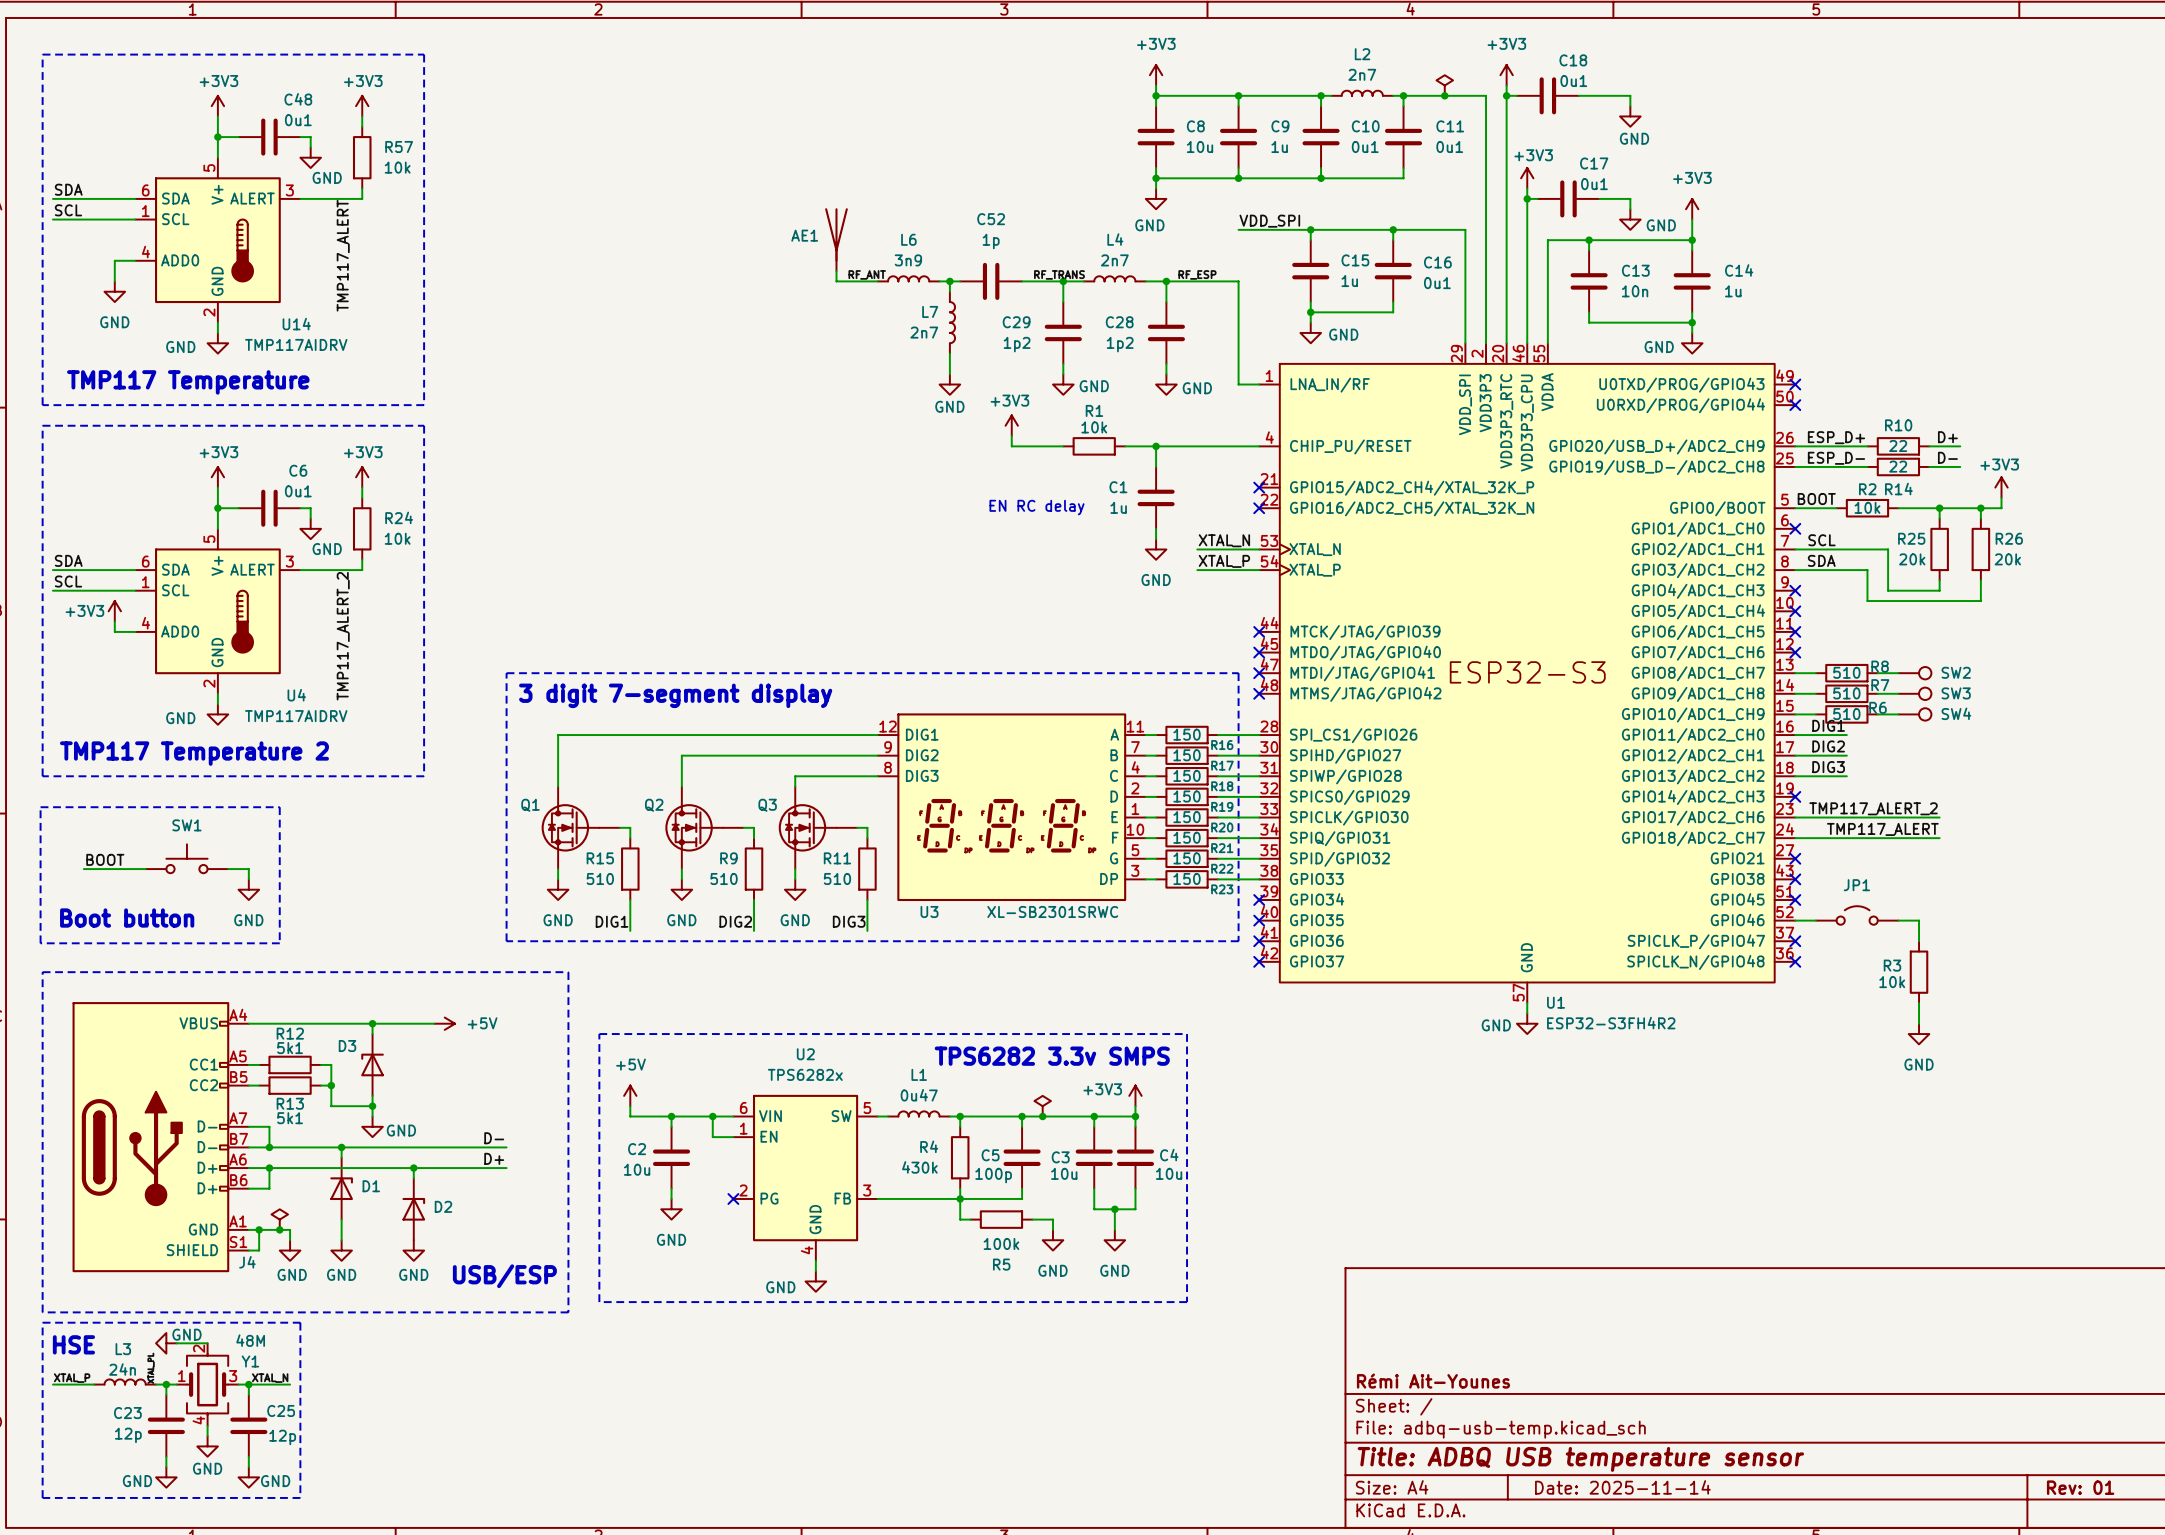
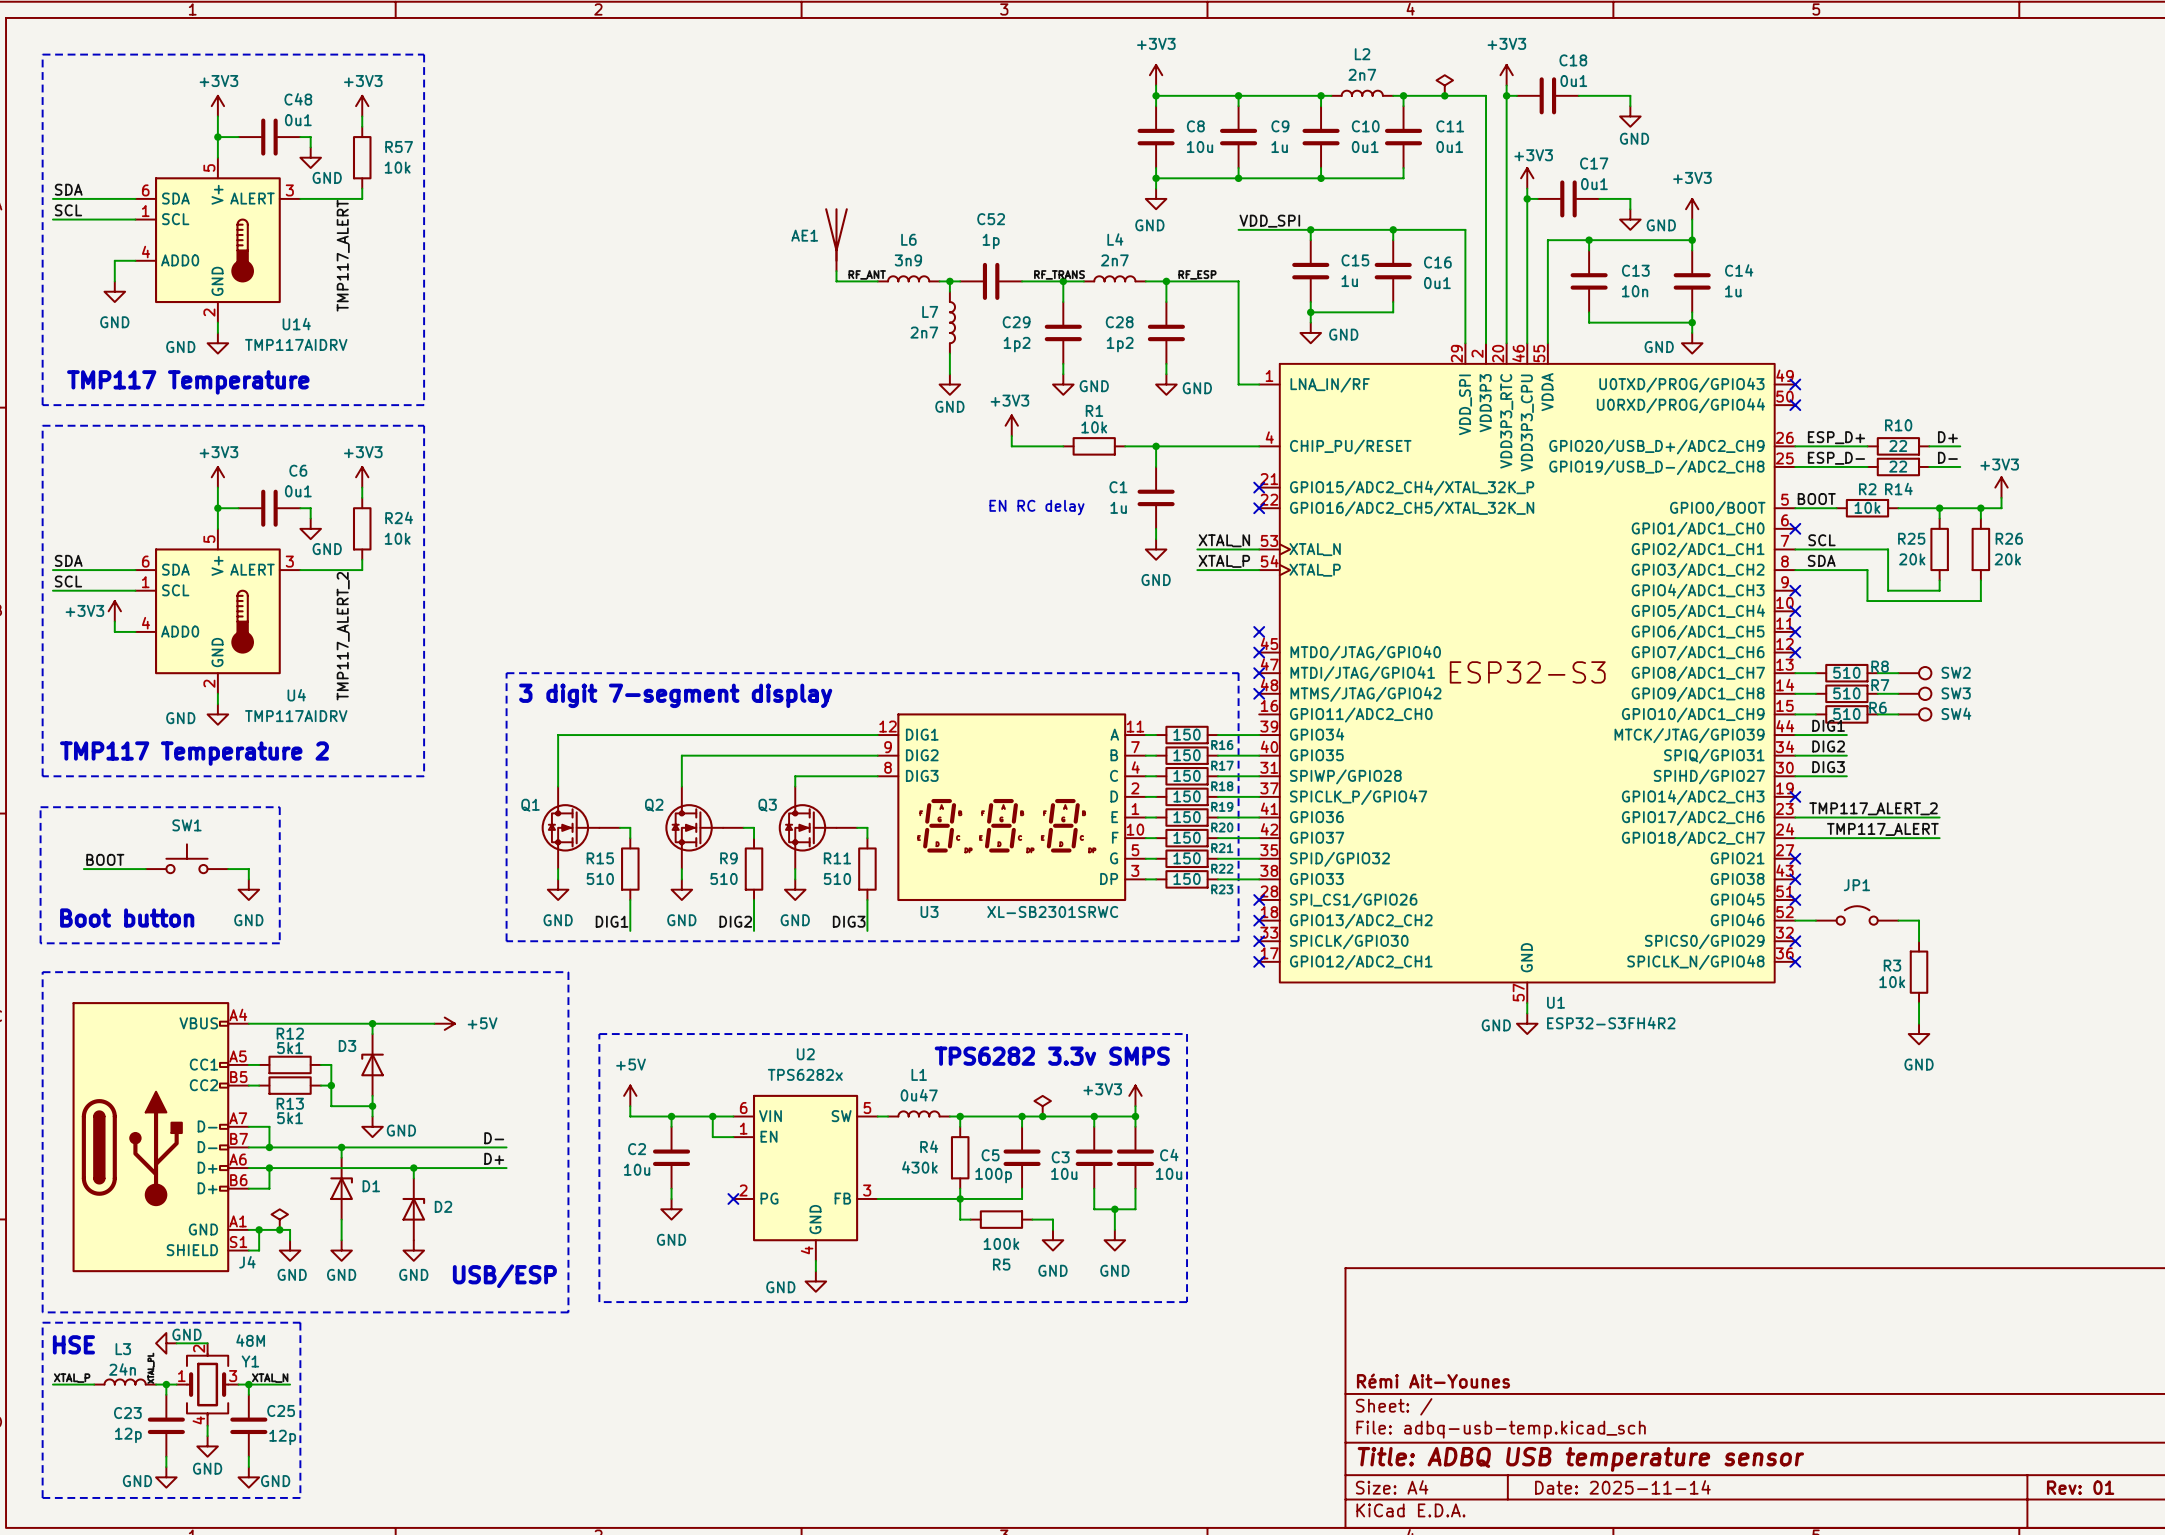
U1 symbol: [1259, 343, 1796, 1004] -> [1259, 343, 1796, 1004]

